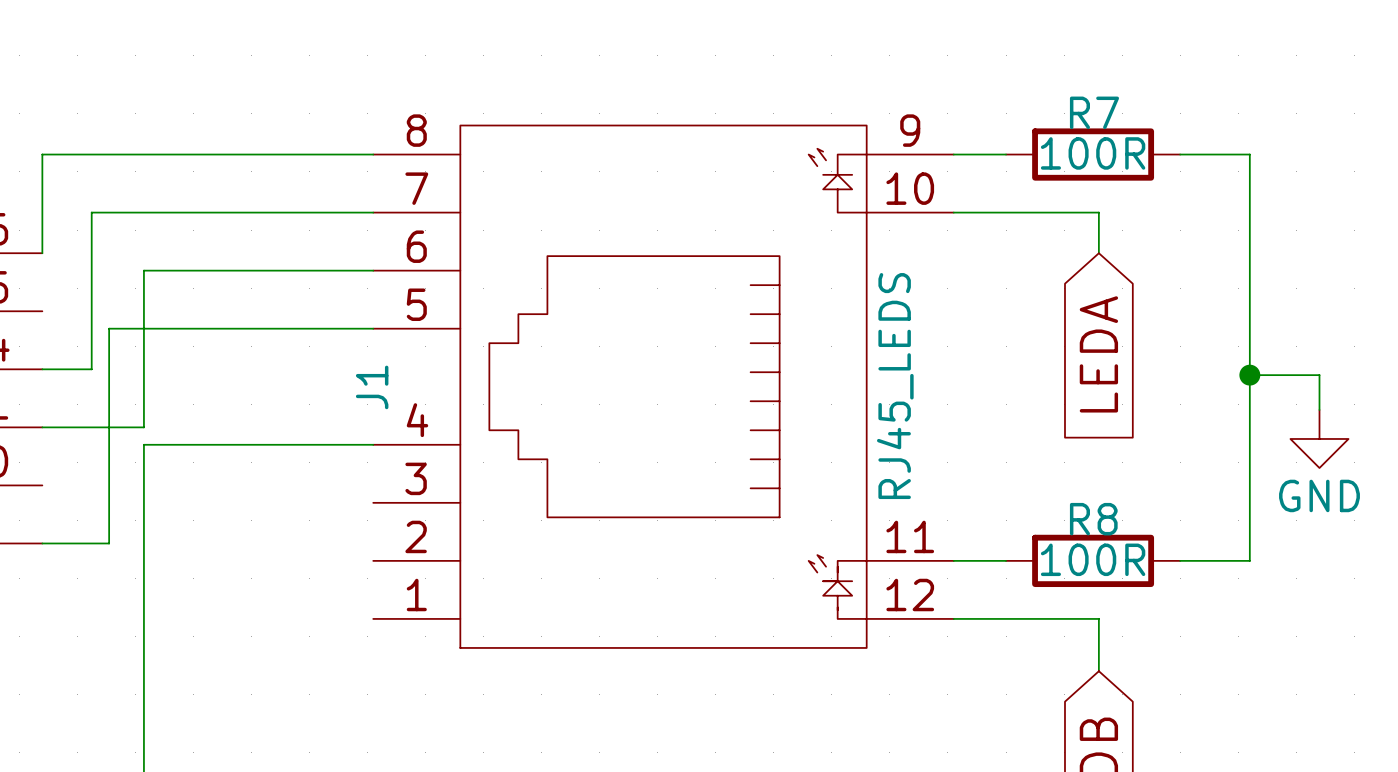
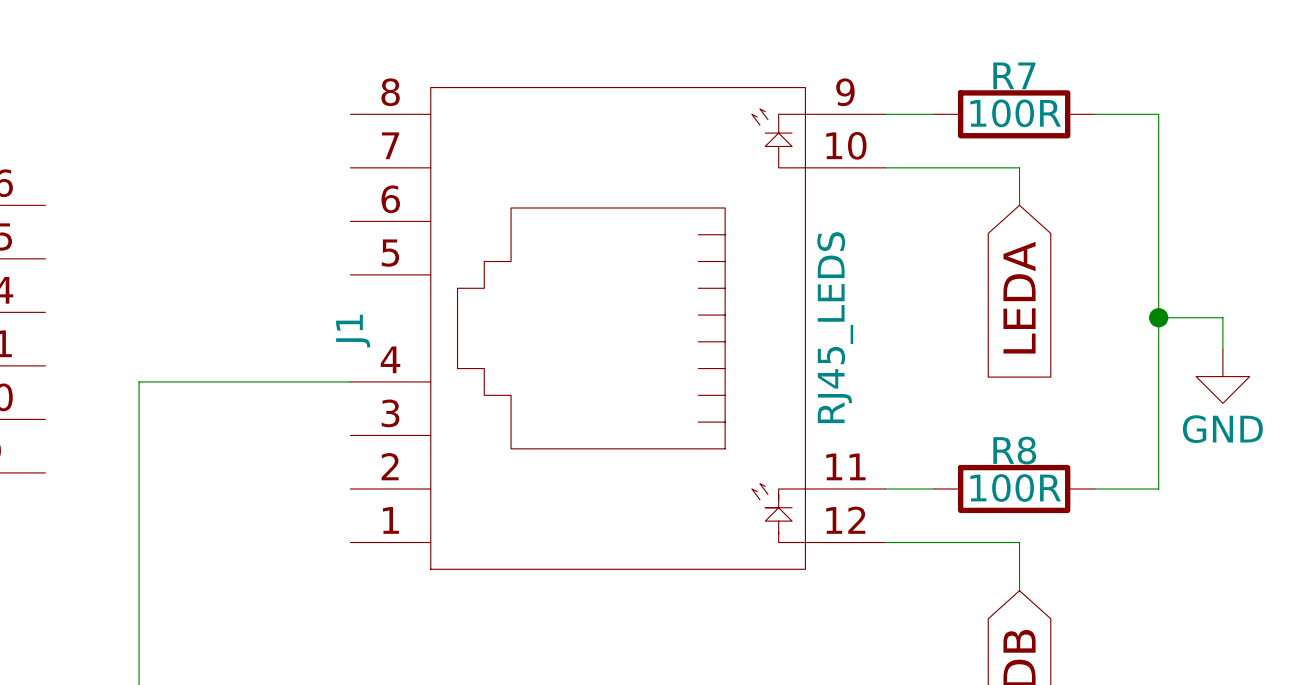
wire: (373, 154) (42, 154) (42, 253) -> none
wire: (373, 212) (91, 212) (91, 369) (42, 369) -> none
wire: (373, 270) (143, 270) (143, 427) (42, 427) -> none
wire: (373, 328) (109, 328) (109, 543) (42, 543) -> none

